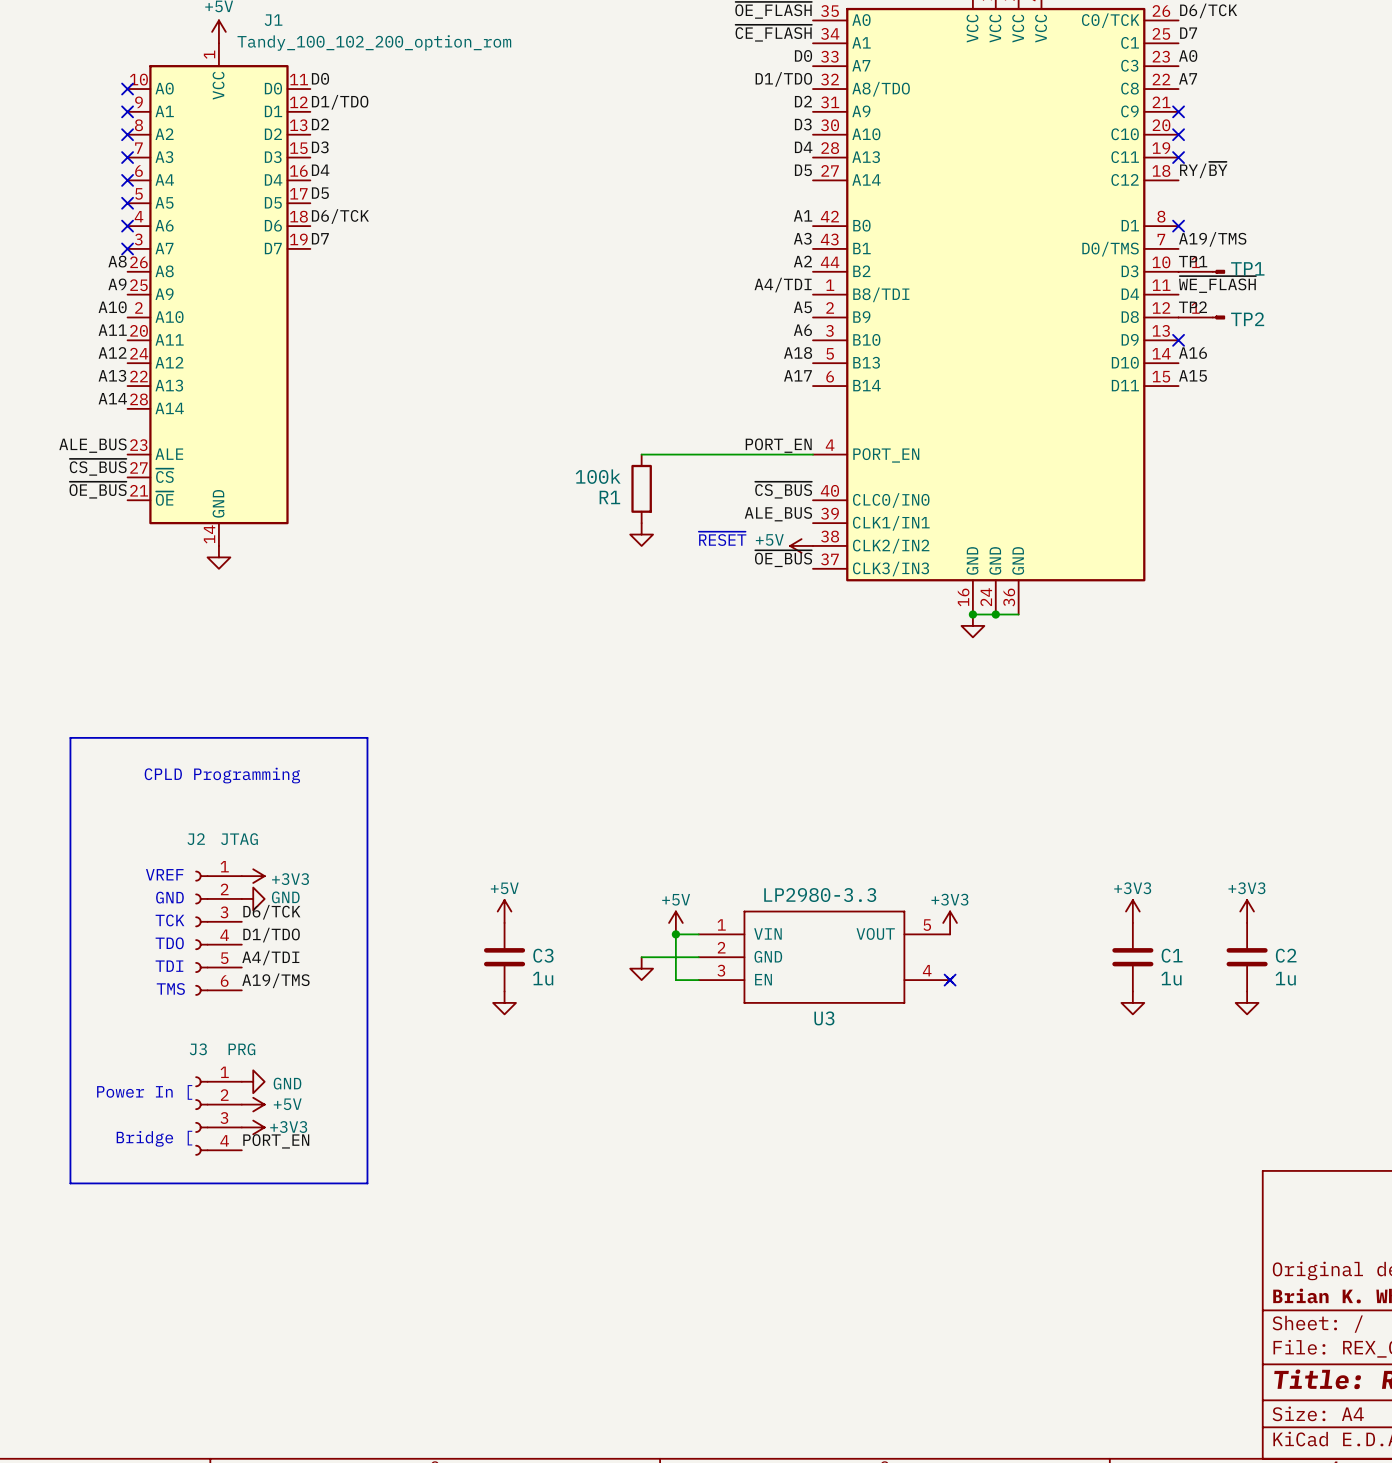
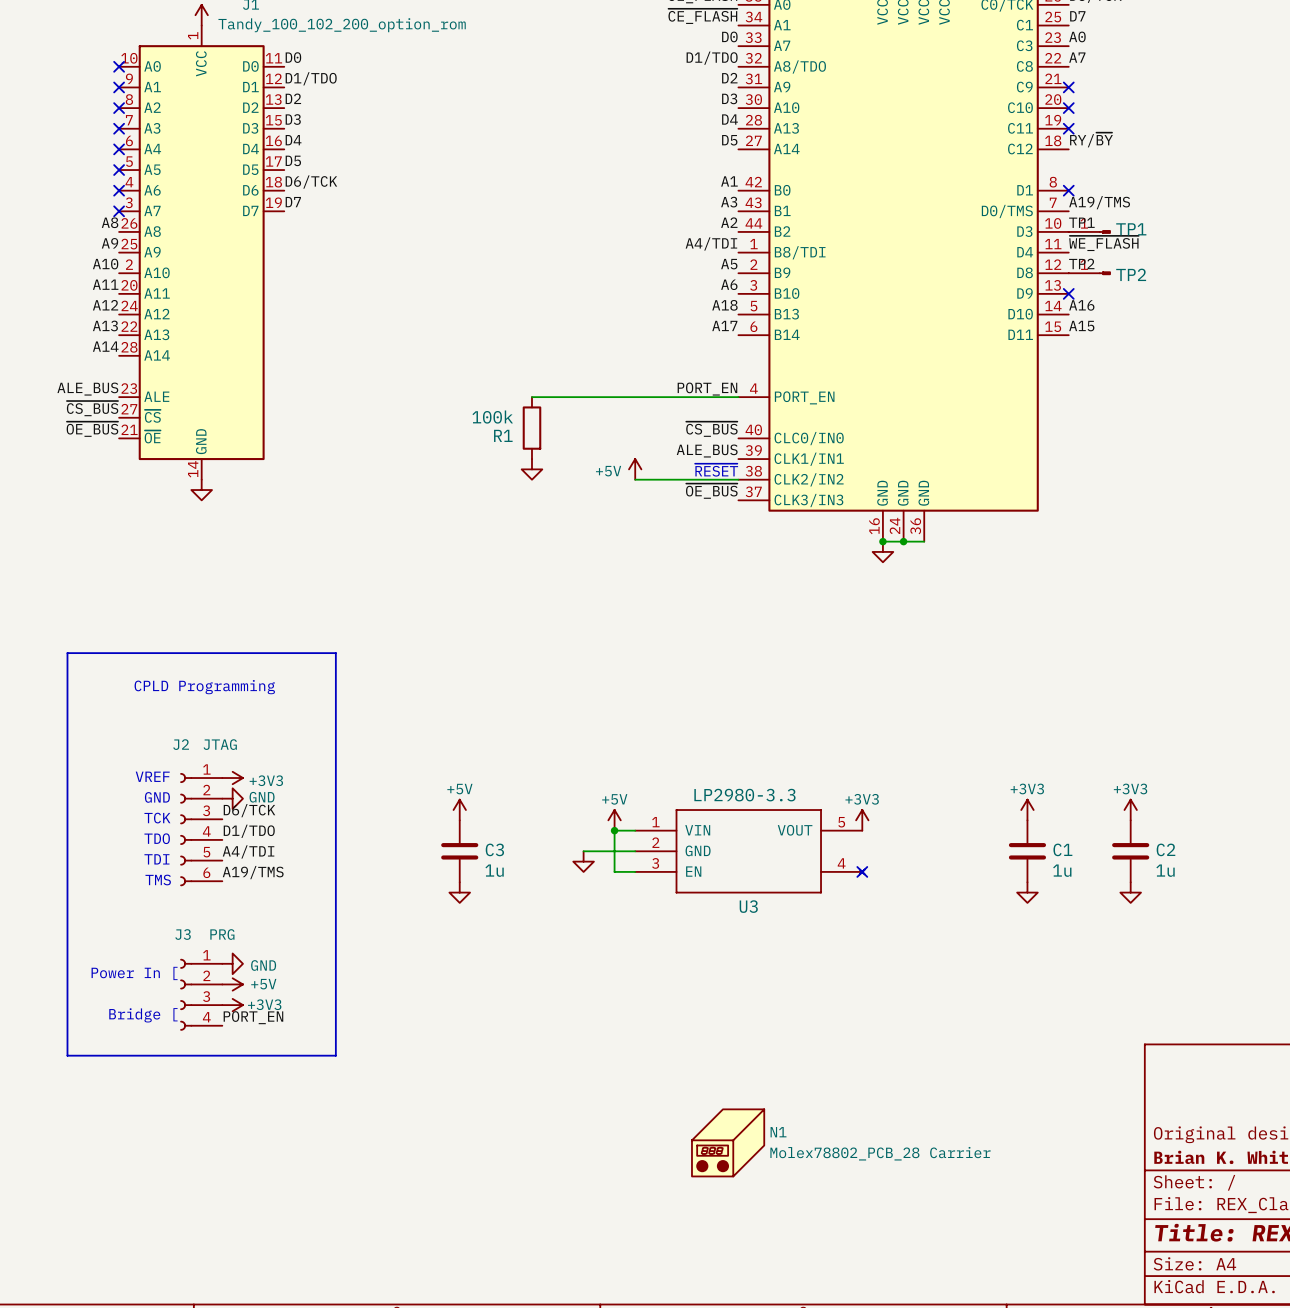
wire: none -> (531, 397) (583, 397)
R1 position: (641, 488) -> (531, 428)
power symbol position: (641, 534) -> (531, 469)
text position: ~{RESET} (722, 538) -> ~{RESET} (716, 470)
wire: none -> (635, 479) (738, 479)
power symbol rotation: 0° (801, 545) -> 90° clockwise (635, 469)
power symbol position: +5V (801, 545) -> +5V (635, 469)
N1: none -> Molex78802_PCB_28 Carrier (728, 1142)

